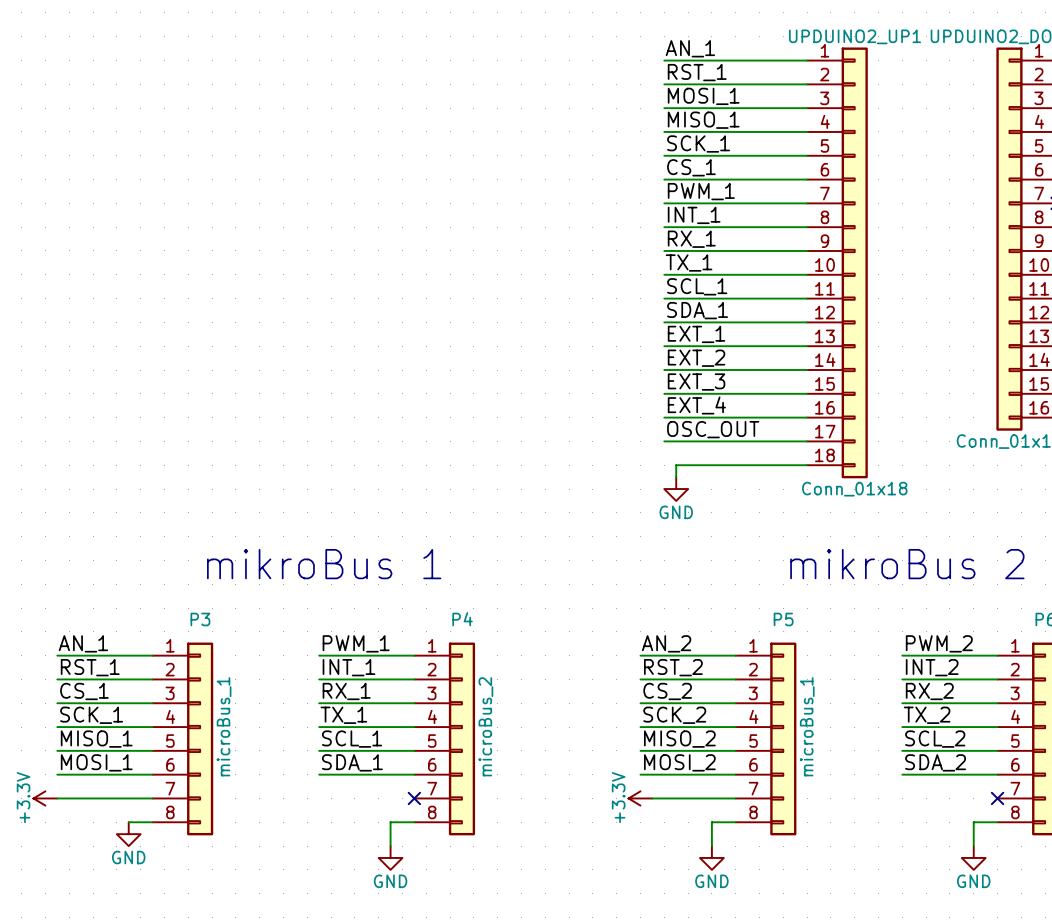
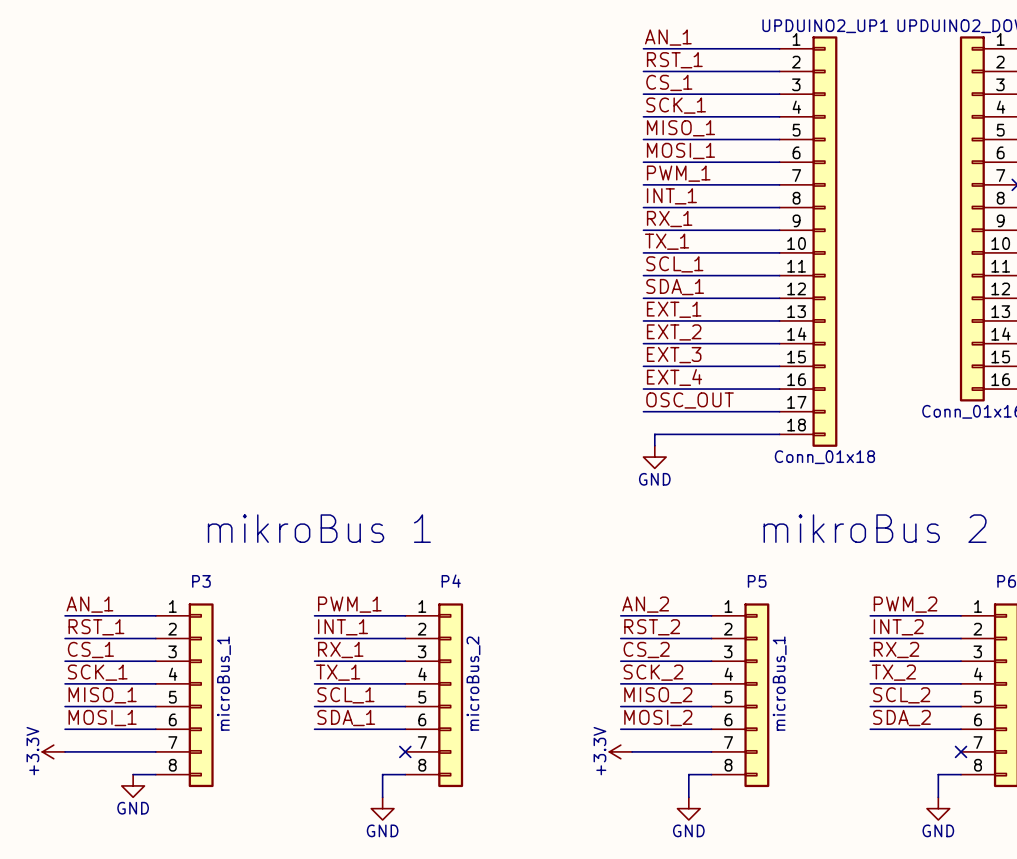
label: MOSI_1 (703, 96) -> CS_1 (669, 82)
label: MISO_1 (703, 120) -> SCK_1 (676, 105)
label: SCK_1 (698, 143) -> MISO_1 (680, 128)
label: CS_1 (691, 167) -> MOSI_1 (680, 150)

